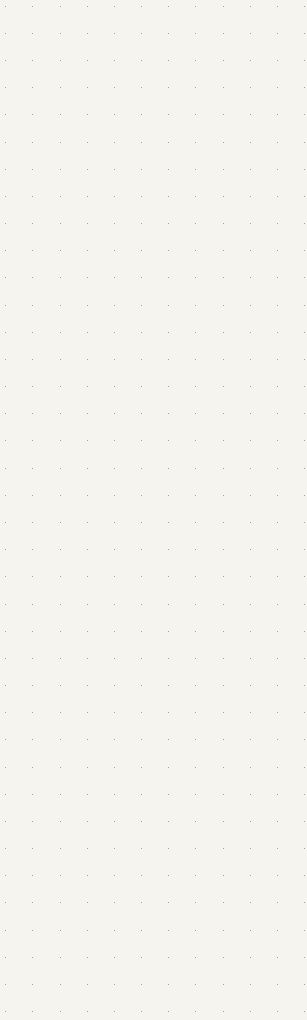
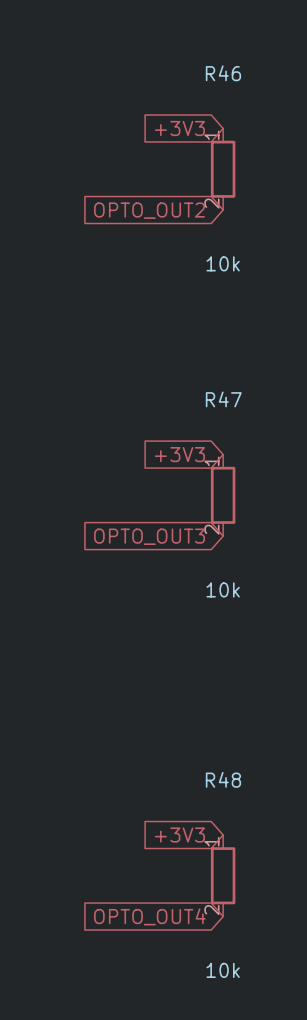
global label: none -> +3V3 (179, 128)
R46: none -> 10k (223, 169)
global label: none -> OPTO_OUT2 (149, 210)
global label: none -> +3V3 (179, 454)
R47: none -> 10k (223, 495)
global label: none -> OPTO_OUT3 (149, 536)
global label: none -> +3V3 (179, 835)
R48: none -> 10k (223, 875)
global label: none -> OPTO_OUT4 (149, 916)

